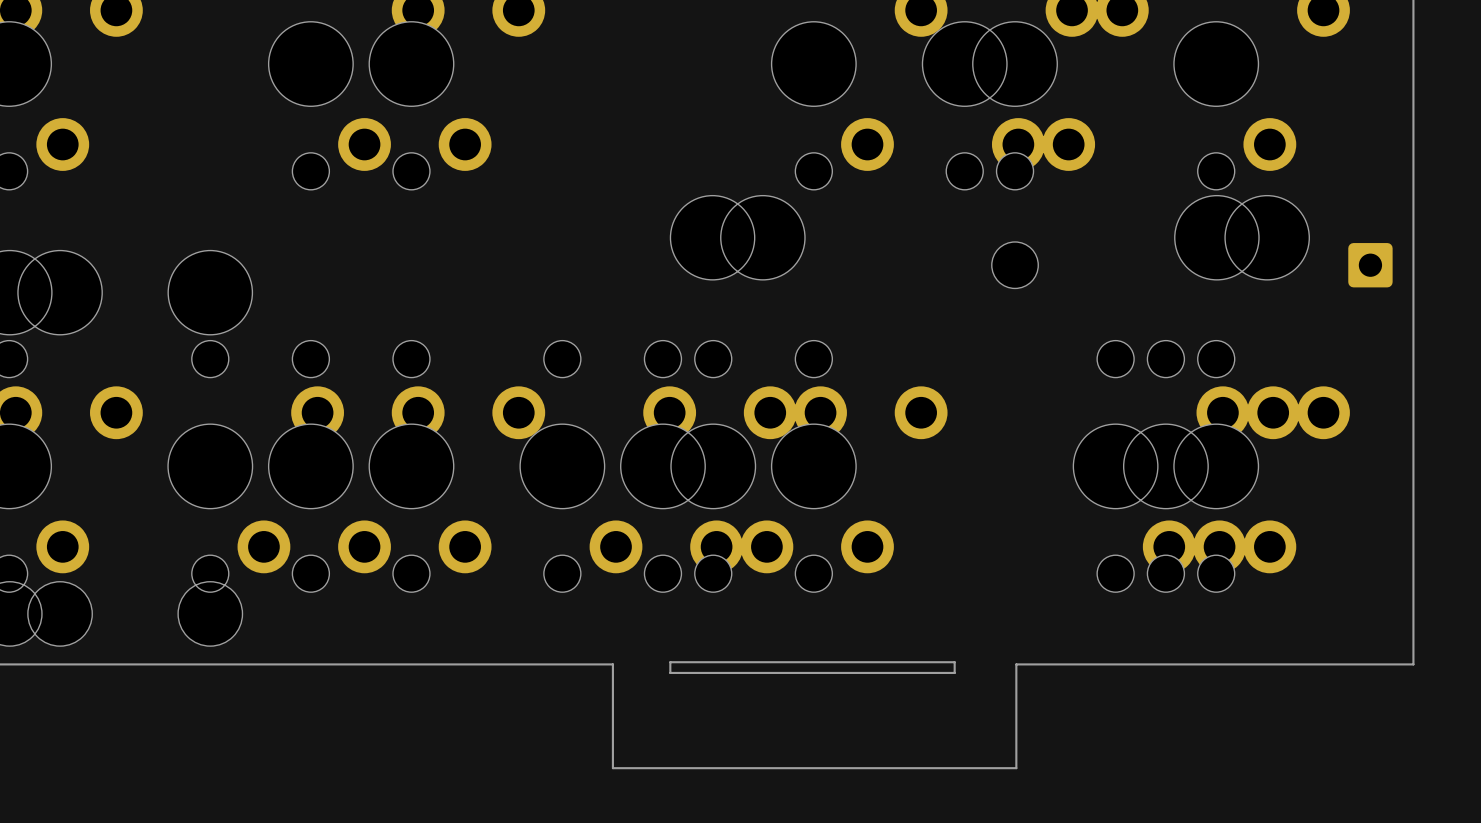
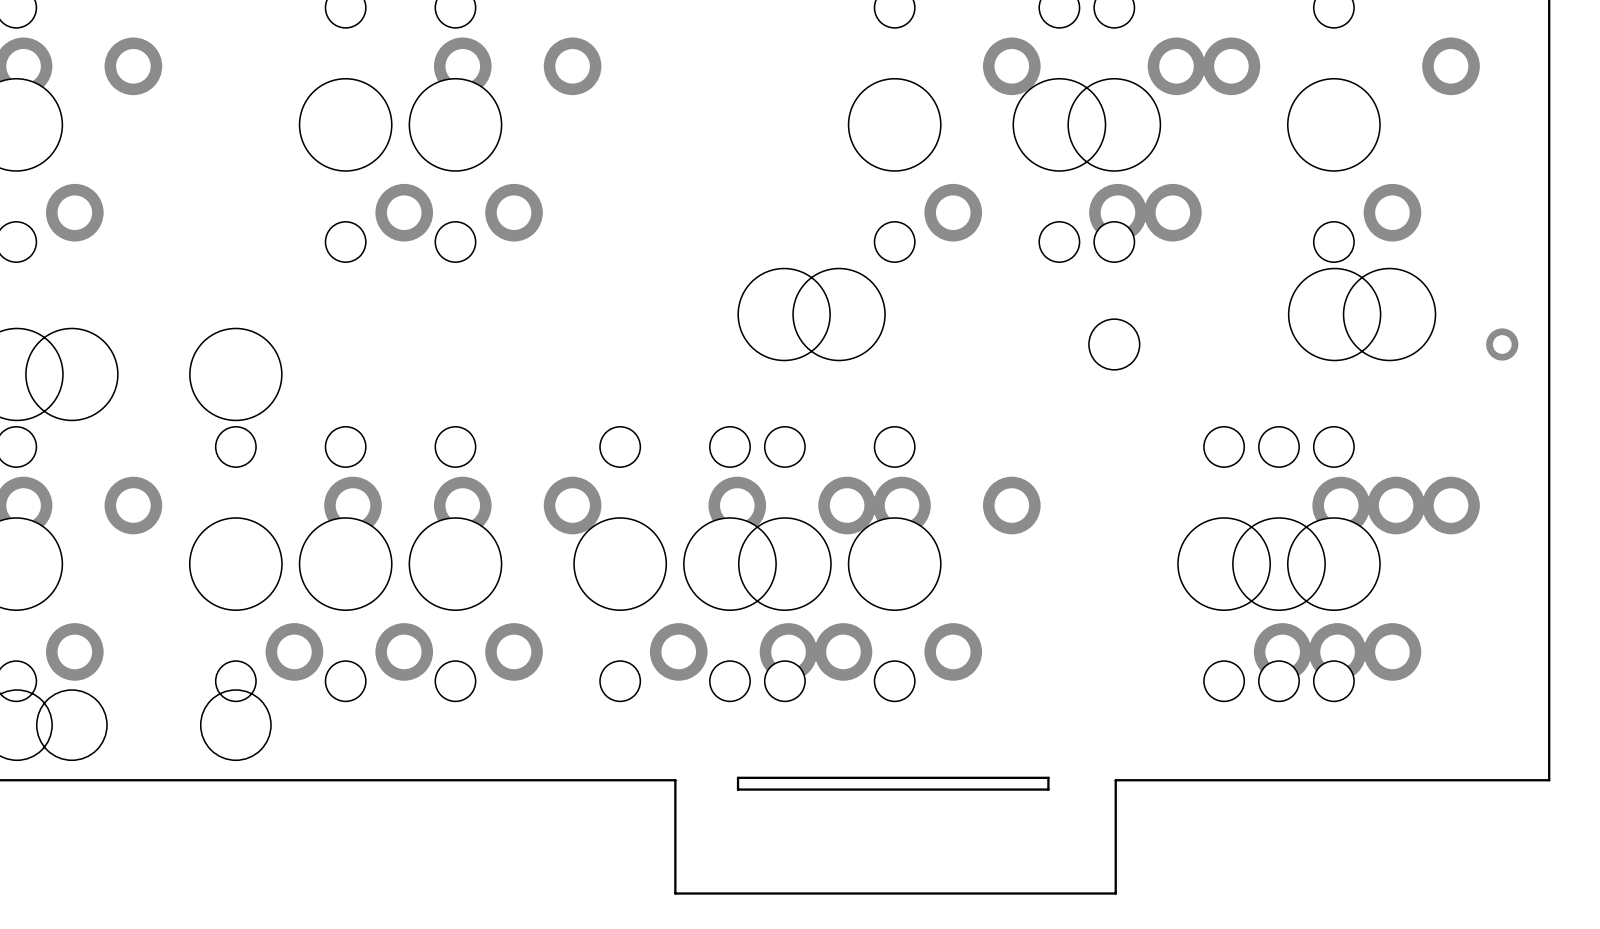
part footprint: [1348, 243, 1393, 288] -> [1486, 328, 1519, 361]

